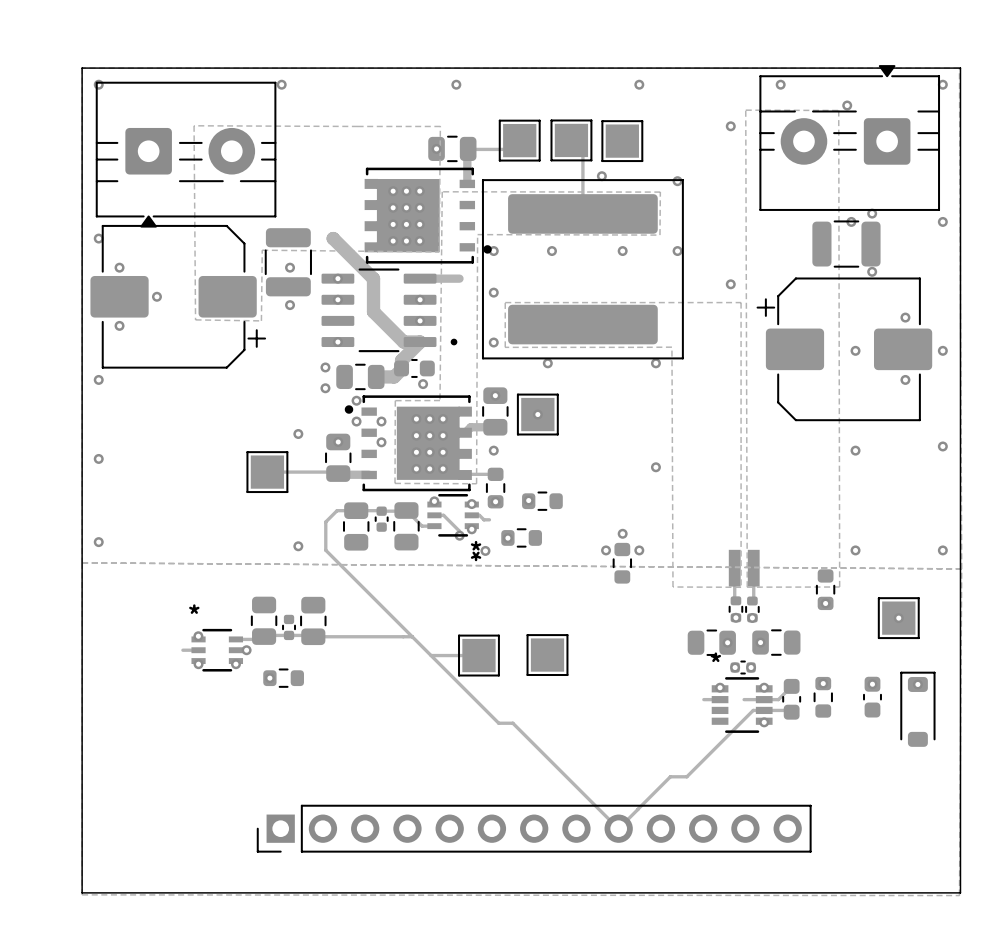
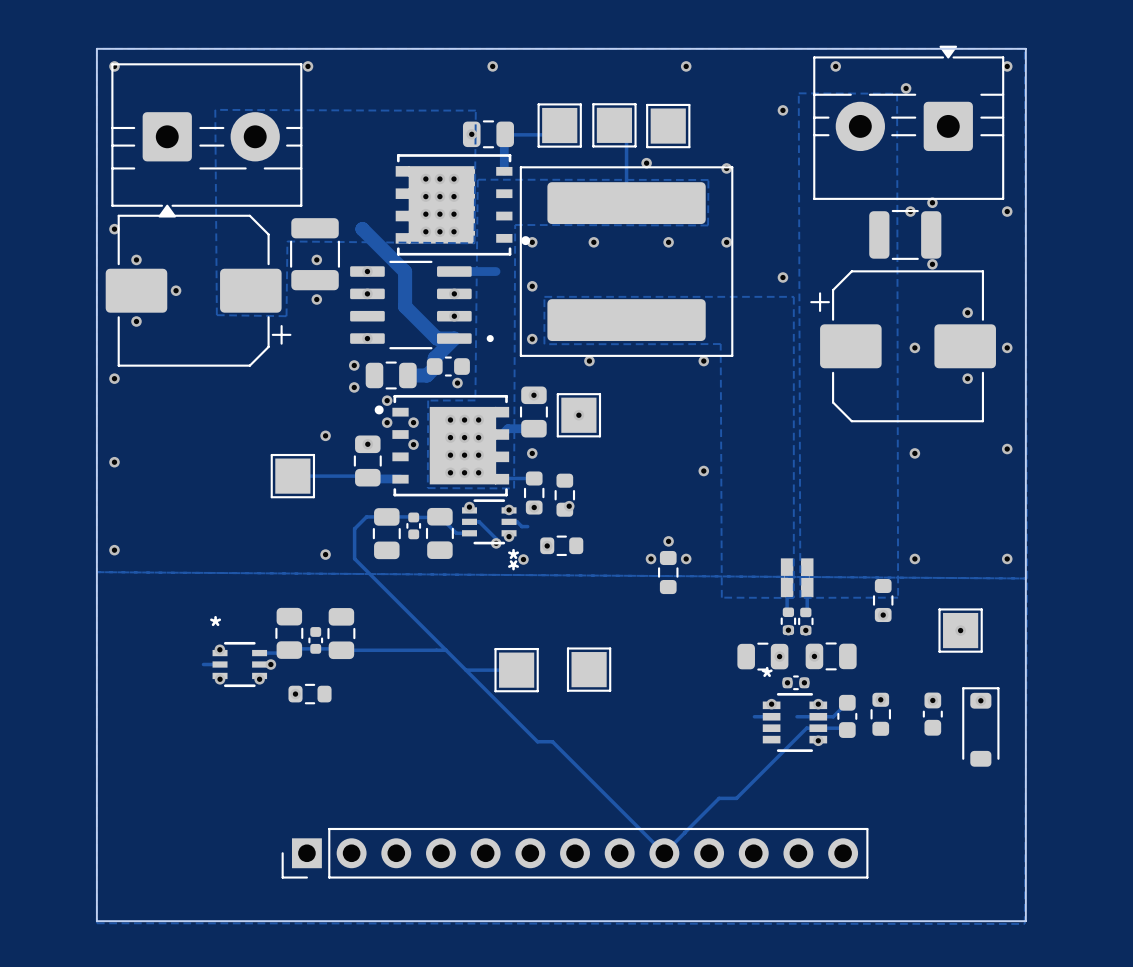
part rotation: 0° (542, 501) -> 90° clockwise (564, 495)

